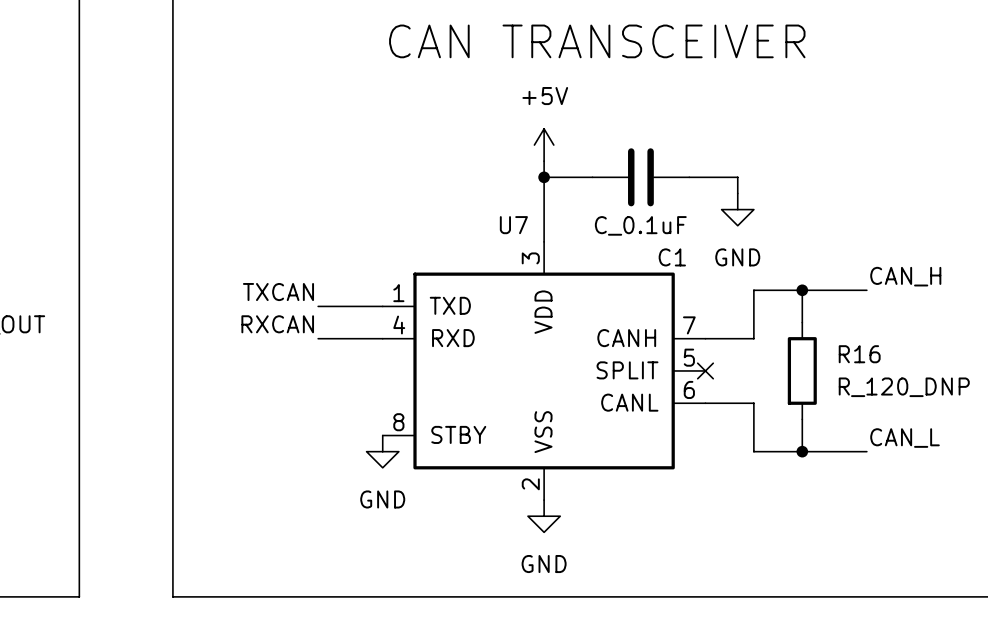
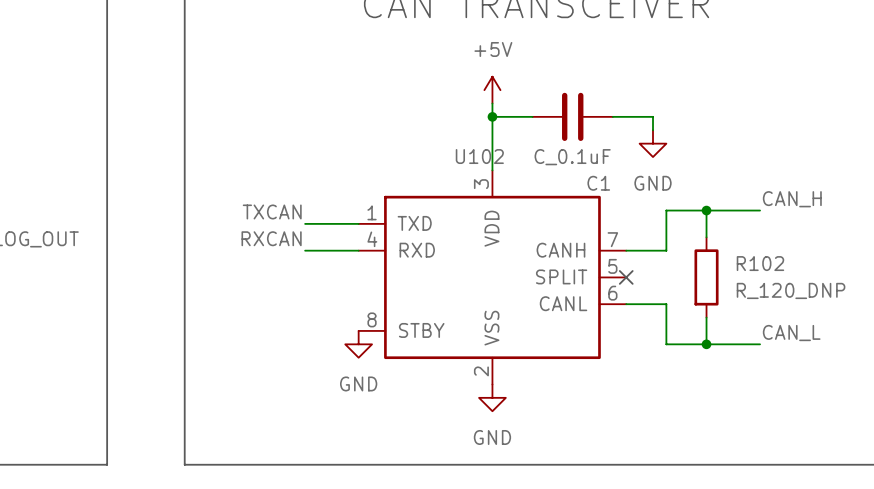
U7 name: U7 (513, 225) -> U102 (479, 156)
R16 name: R16 (859, 354) -> R102 (760, 263)

